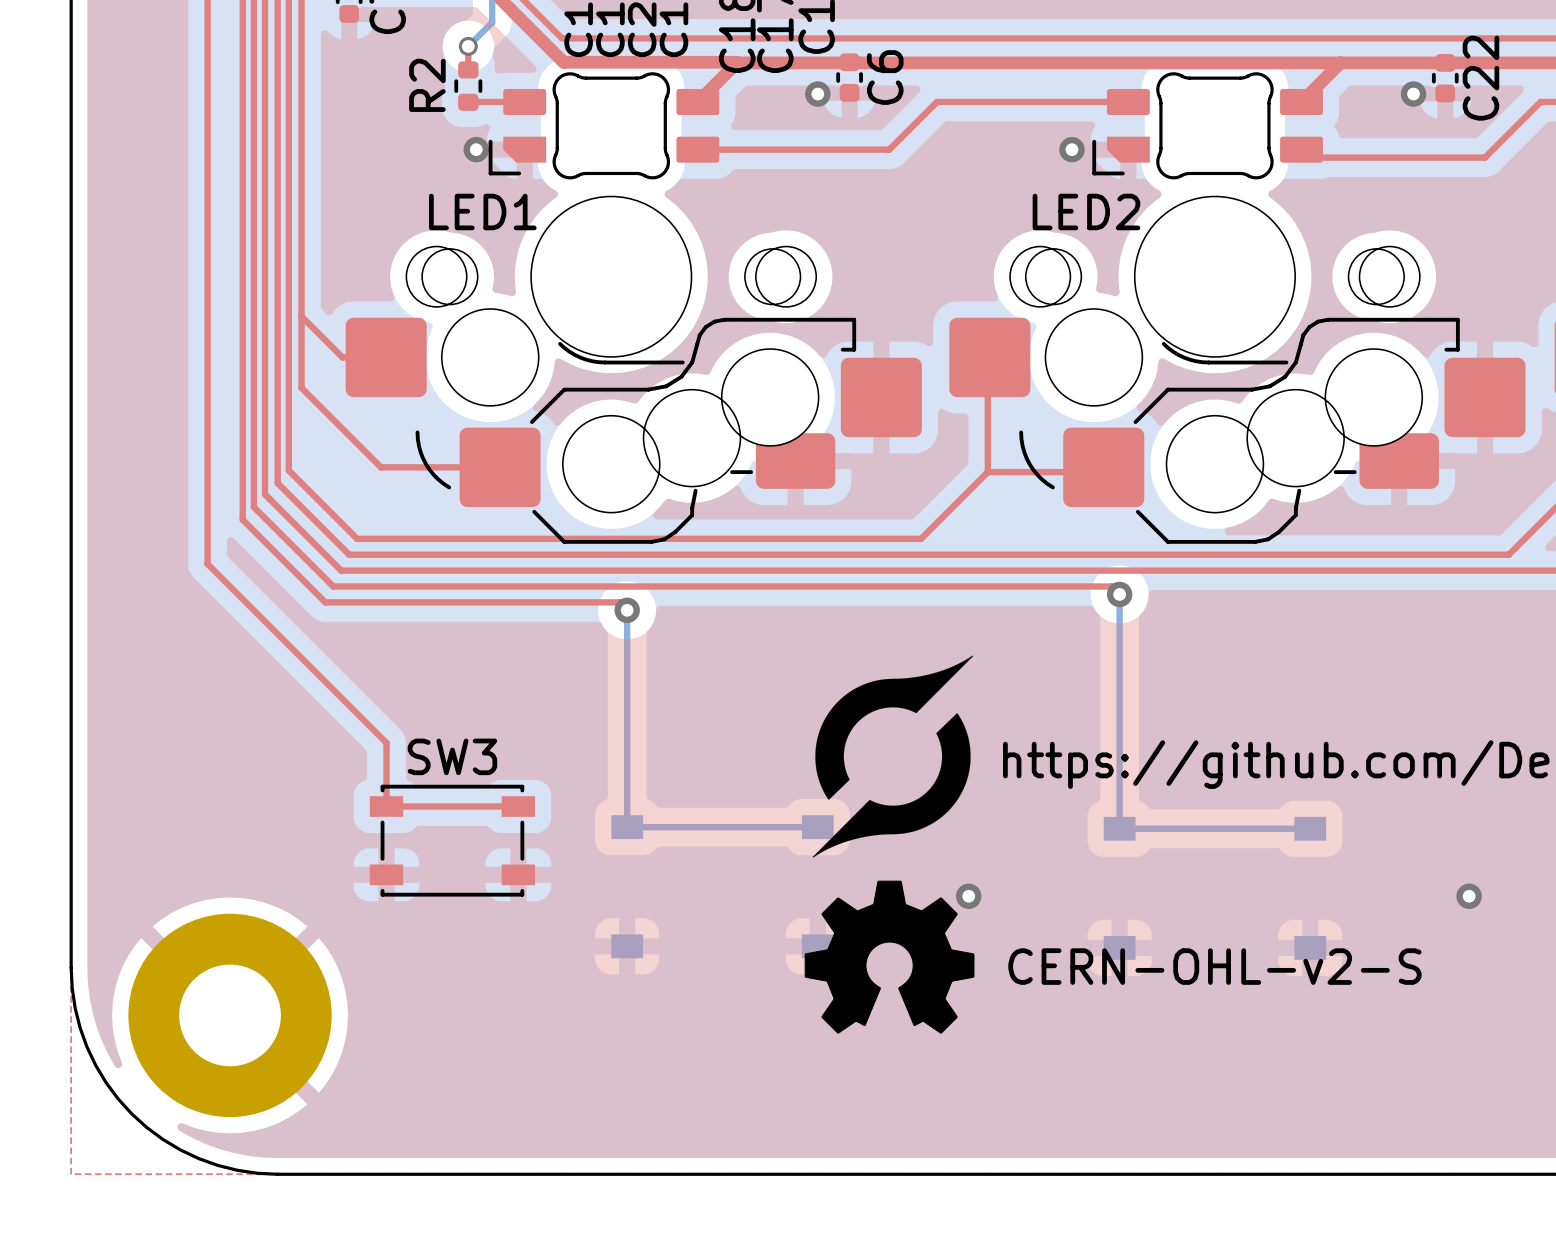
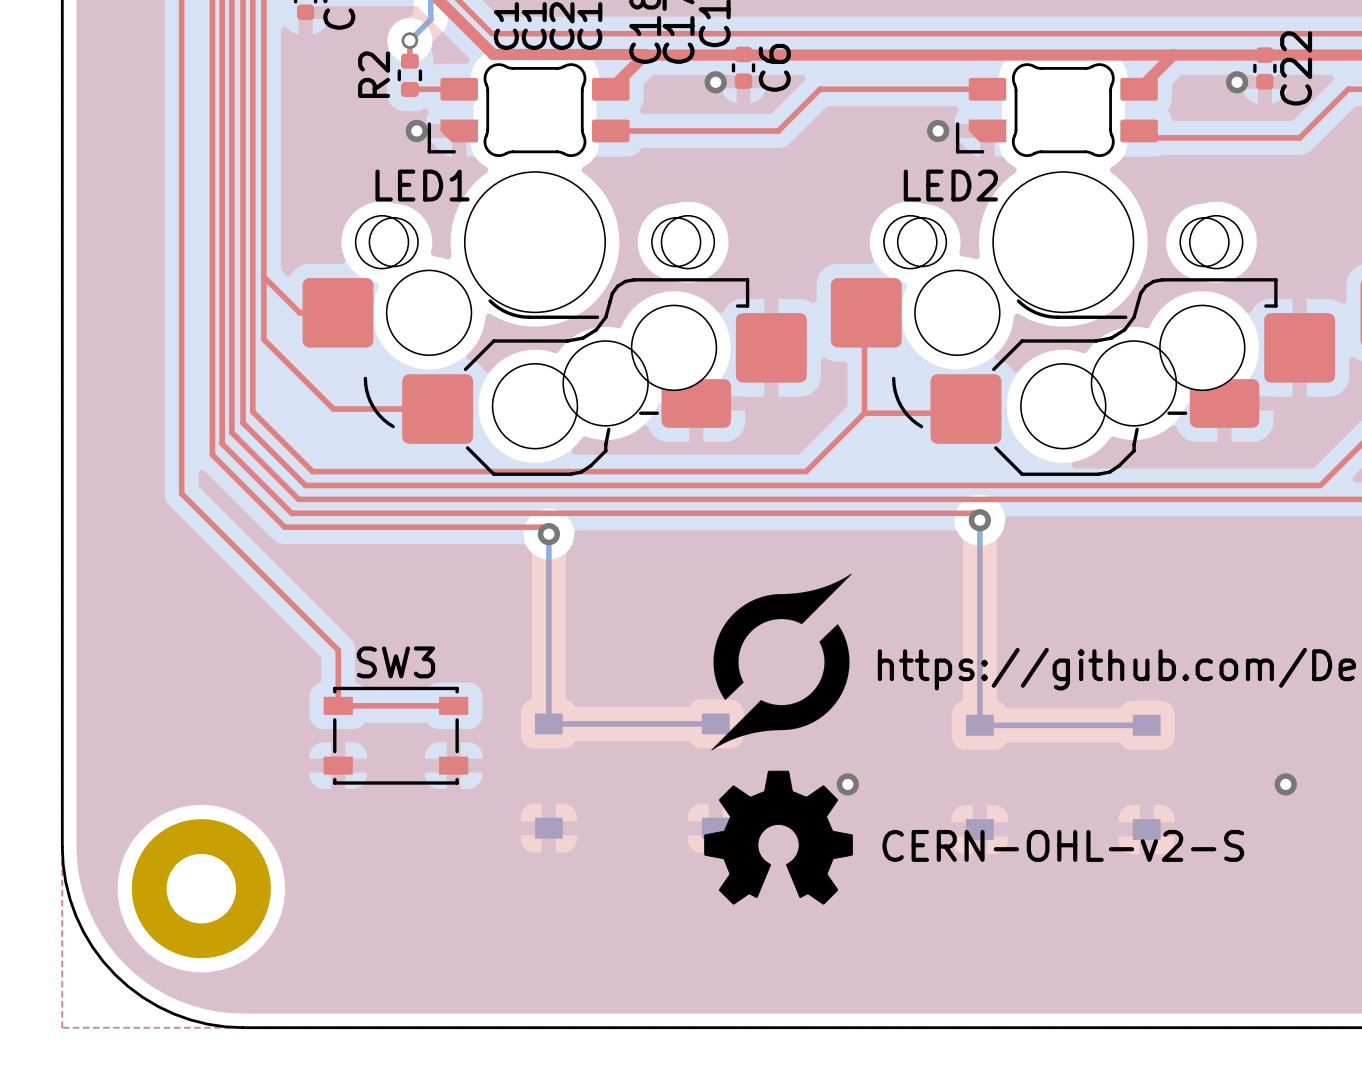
part footprint: [128, 913, 332, 1118] -> [131, 819, 271, 959]

